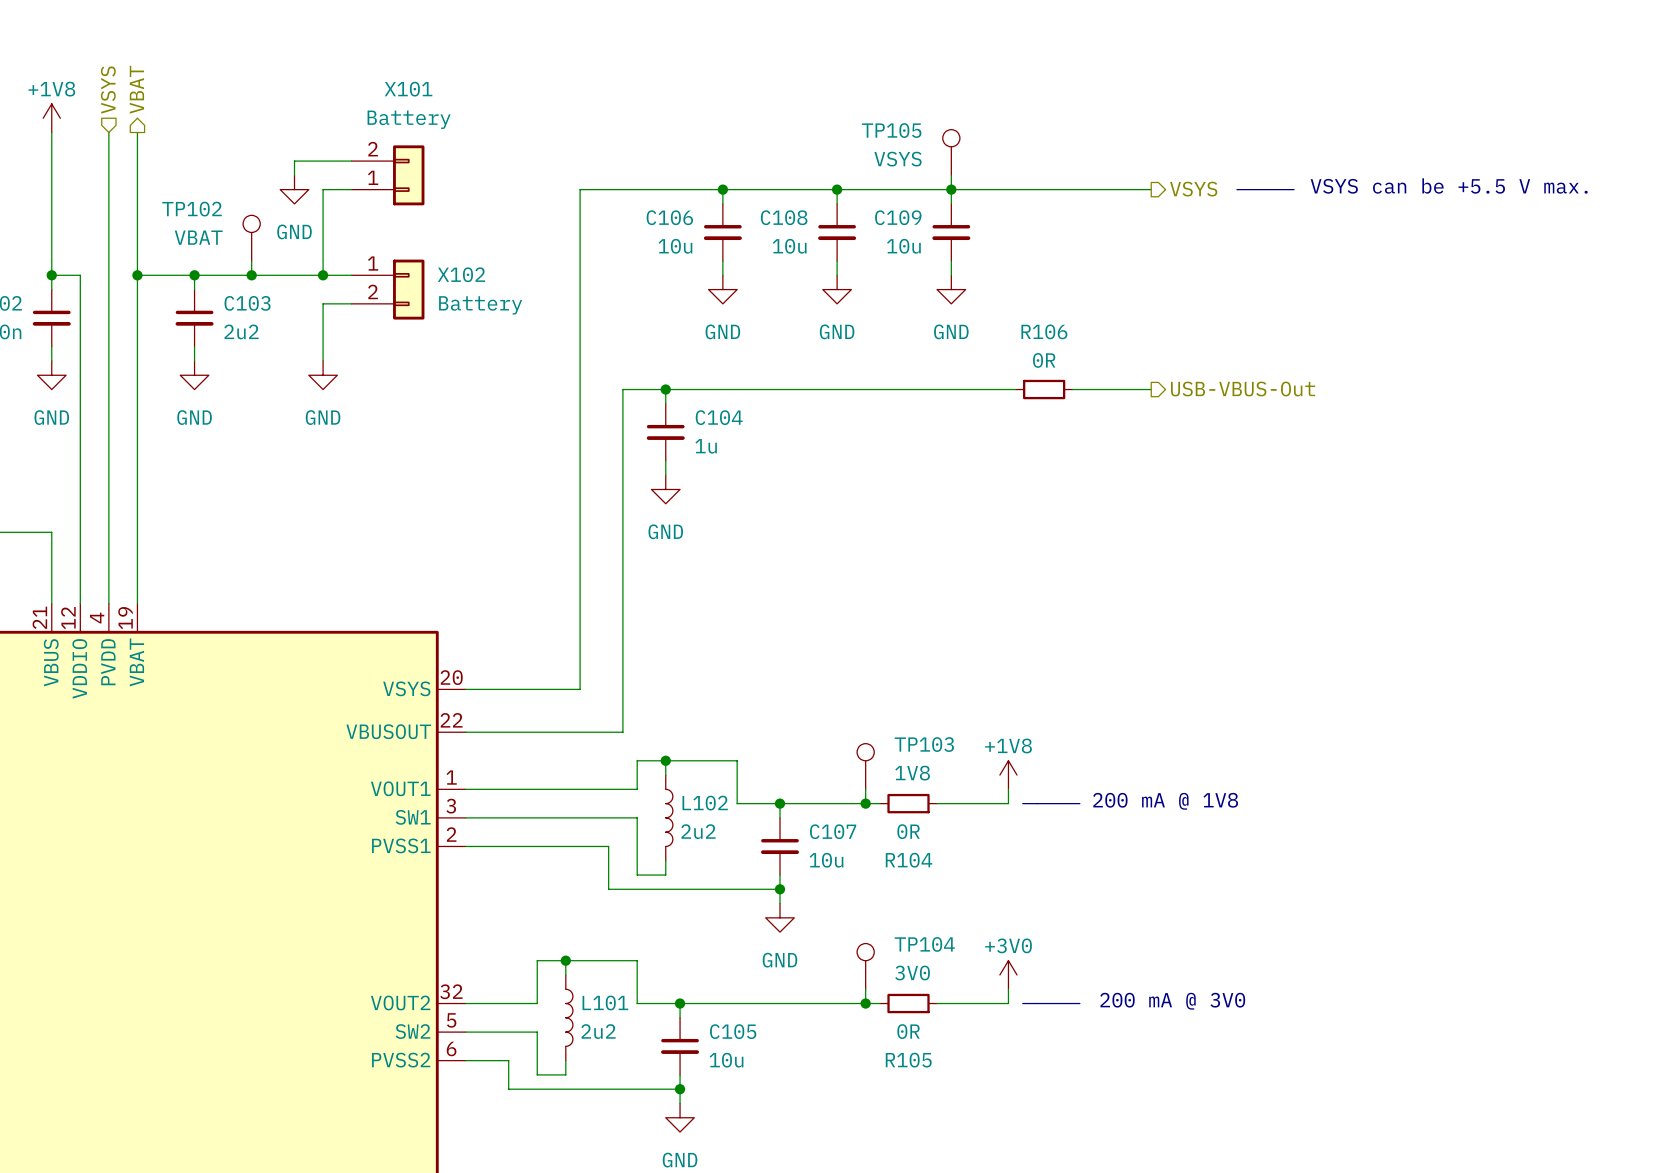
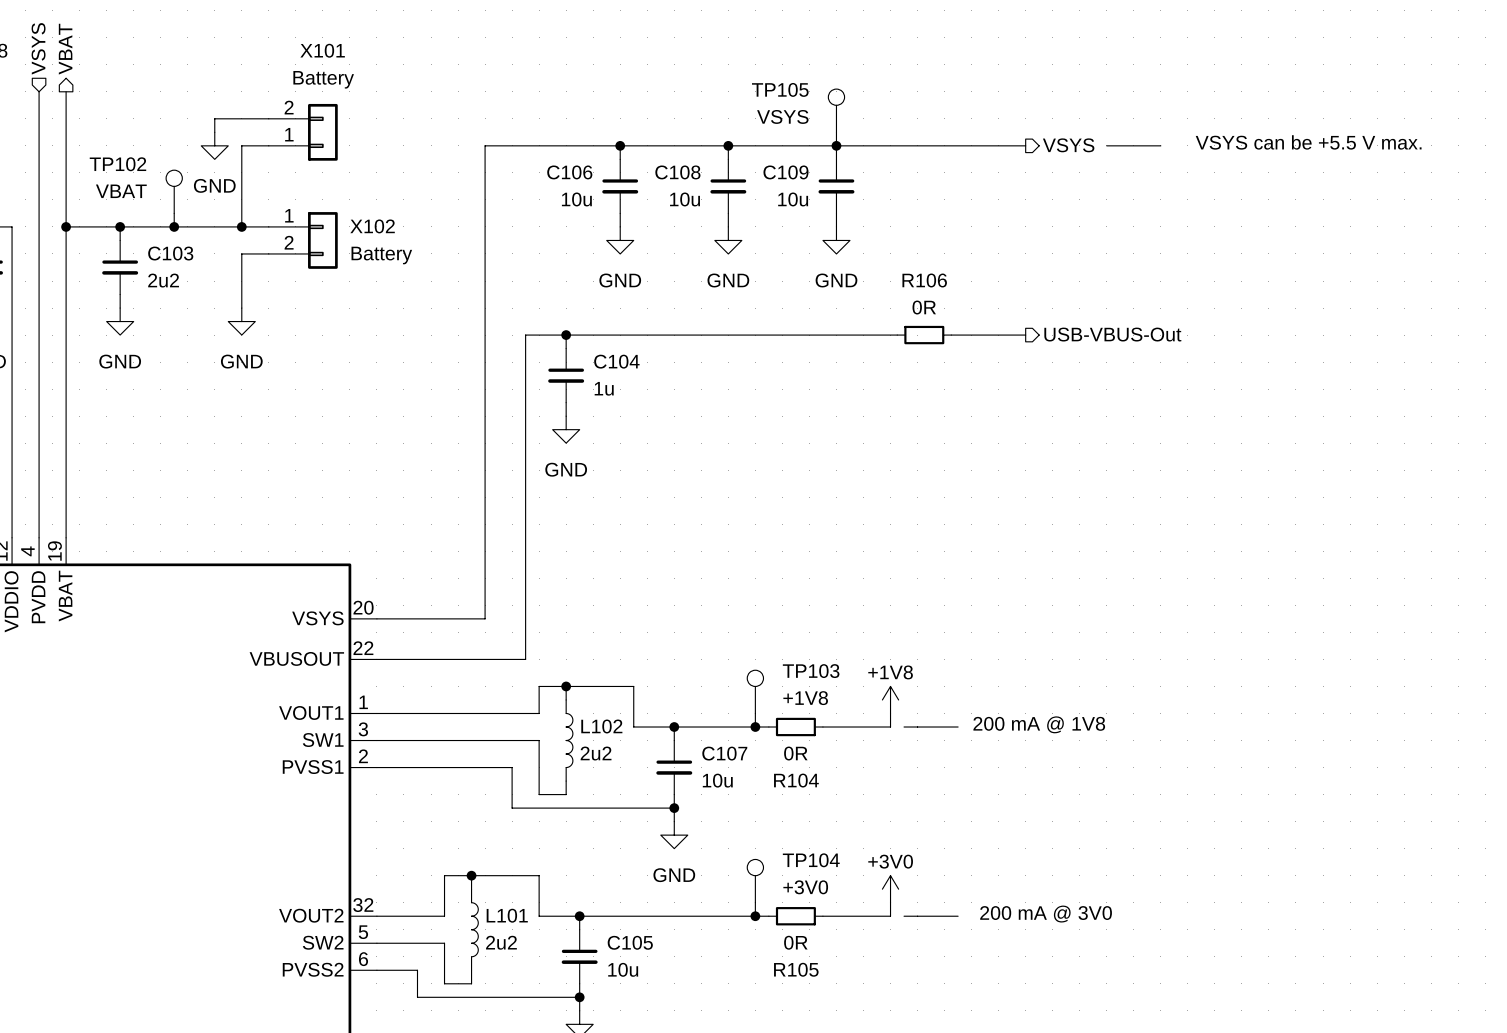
TP103 value: 1V8 (912, 773) -> +1V8 (805, 698)
TP104 value: 3V0 (912, 973) -> +3V0 (805, 887)

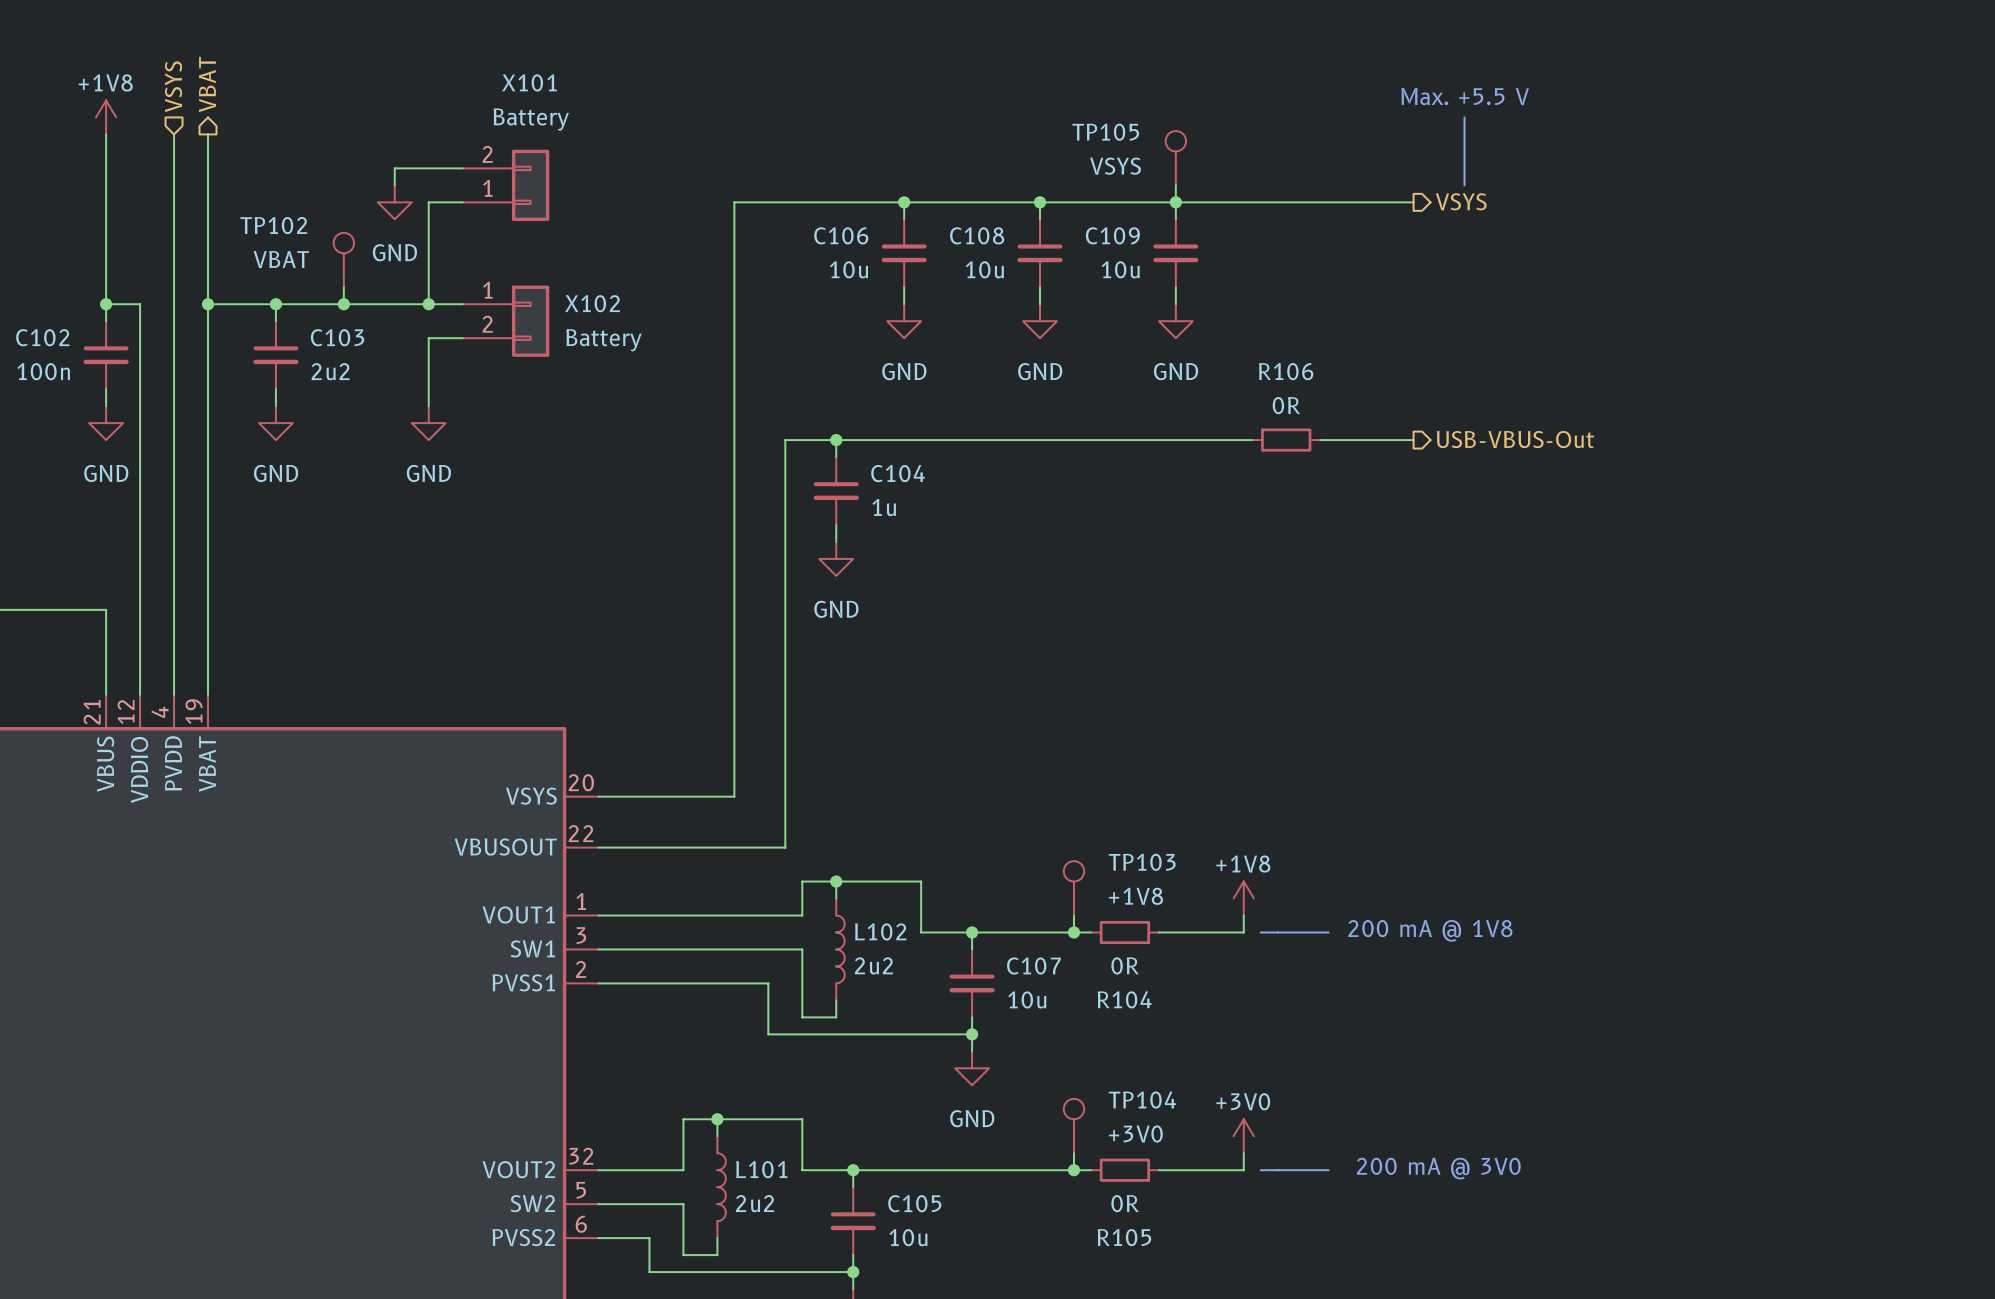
text: none -> Max. +5.5 V (1465, 96)
line: none -> (1464, 117) (1464, 185)
text: VSYS can be +5.5 V max. (1308, 142) -> none
line: (1106, 145) (1160, 145) -> none

